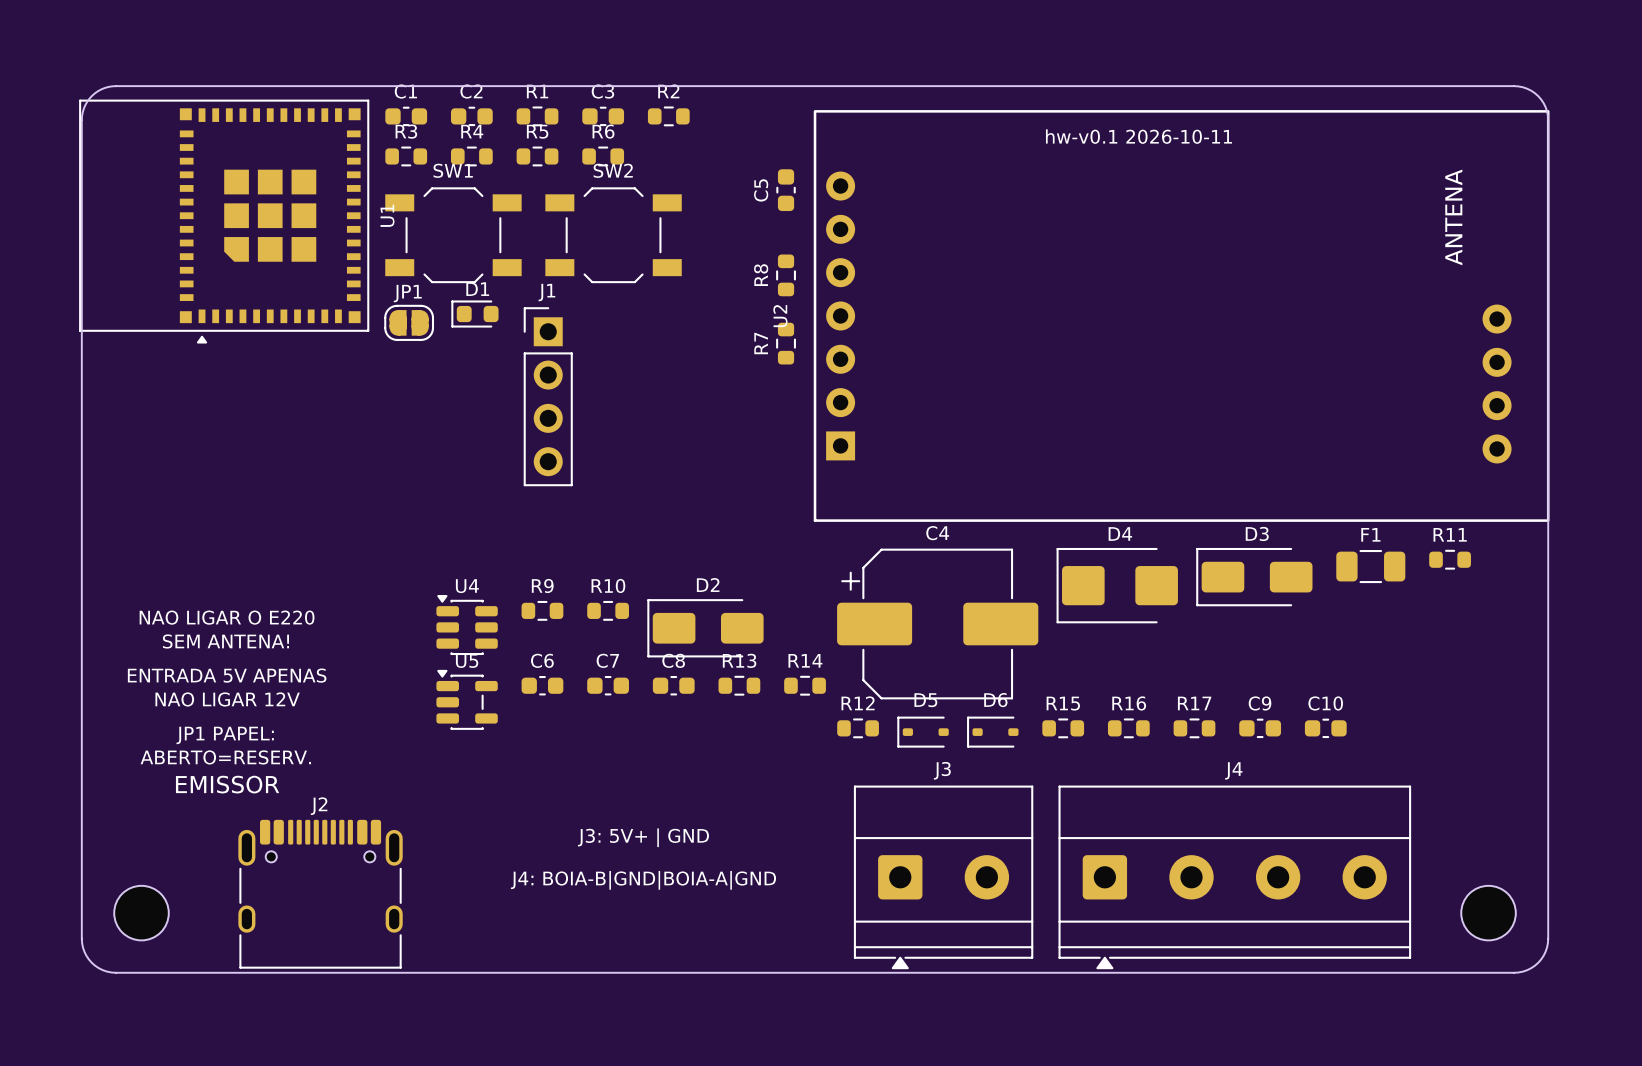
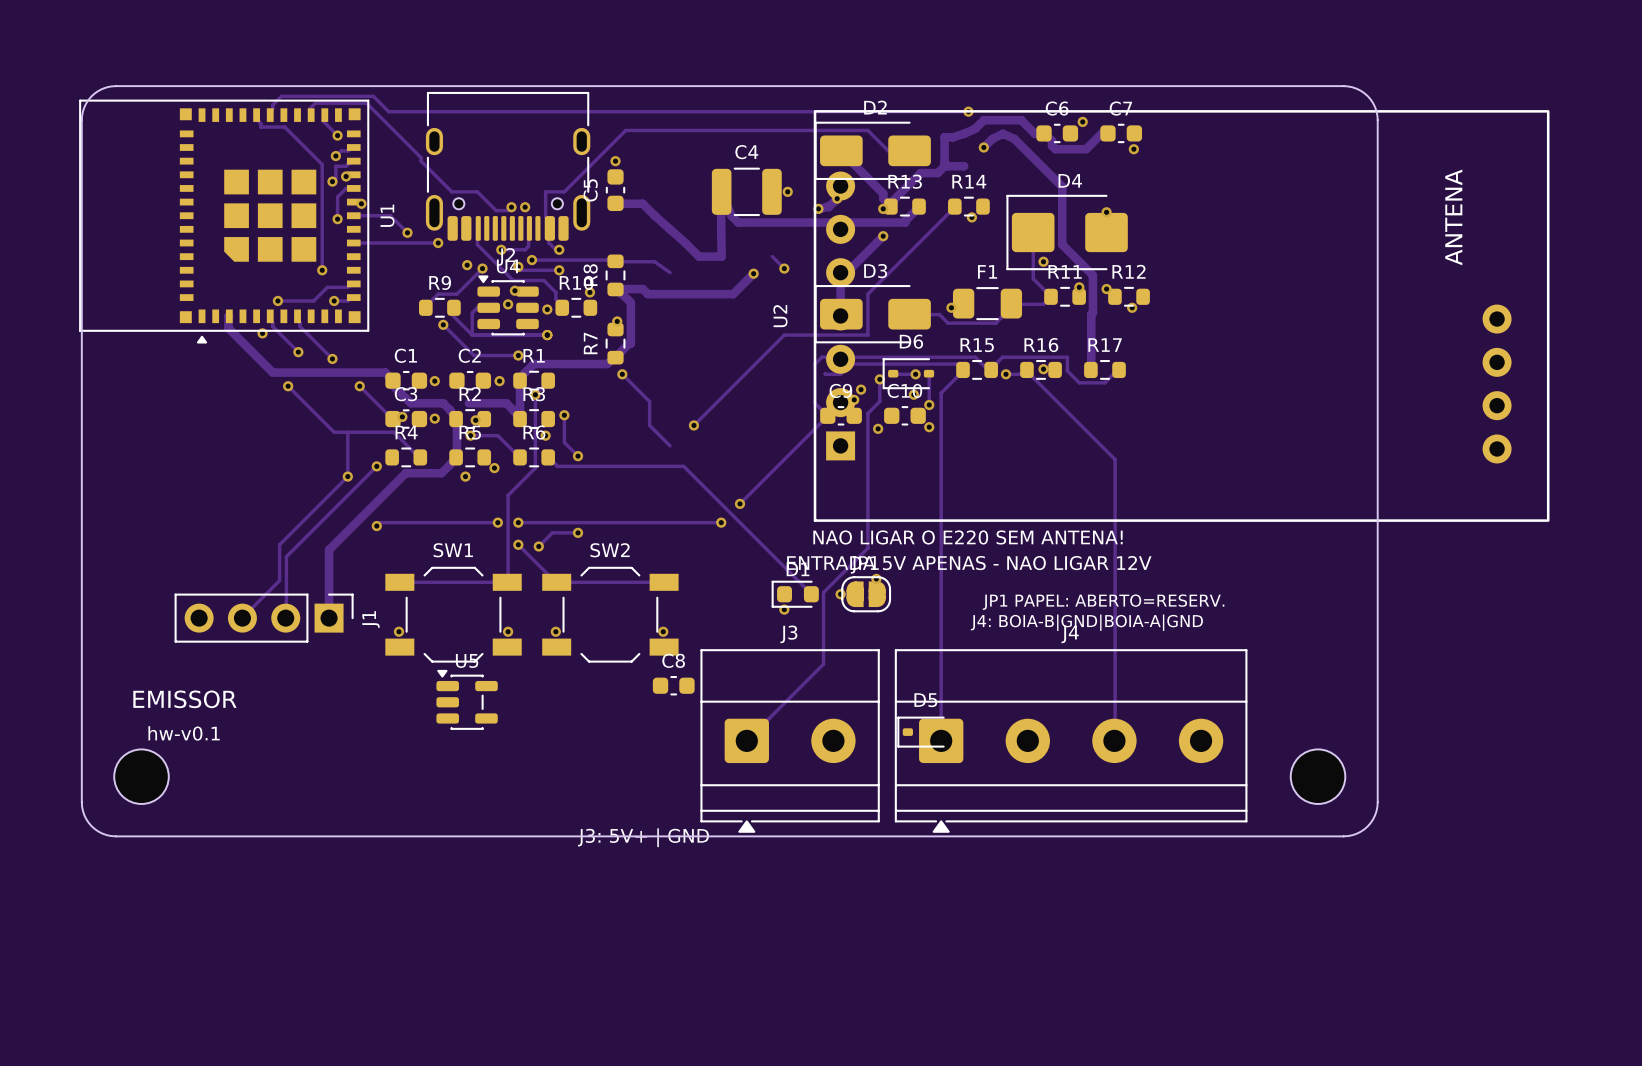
board edge: (1343, 86) (1518, 86) (1527, 88) (1538, 96) (1547, 111) (1548, 938) (1543, 955) (1531, 968) (1514, 972) (111, 972) (102, 970) (91, 962) (86, 955) (82, 943) (81, 802) -> (1343, 86) (1356, 88) (1367, 96) (1375, 107) (1377, 120) (1377, 802) (1373, 819) (1360, 831) (1343, 836) (115, 836) (102, 833) (91, 826) (84, 815) (81, 802)
track: none -> (968, 111) (388, 111) (373, 96) (281, 96) (272, 104) (270, 115)
via: none -> (968, 111)
track: none -> (256, 115) (260, 127) (284, 127) (322, 164) (322, 270)
track: none -> (311, 115) (310, 108) (315, 103) (366, 103) (421, 157) (421, 161) (451, 191) (477, 191) (496, 210) (511, 210)
track: none -> (324, 115) (323, 121) (337, 135)
C1 position: (406, 116) -> (406, 380)
C2 position: (471, 116) -> (470, 380)
R1 position: (537, 116) -> (534, 380)
C3 position: (603, 116) -> (406, 419)
R2 position: (668, 116) -> (470, 419)
via: none -> (1082, 121)
track: none -> (1107, 133) (1101, 133) (1086, 149) (1055, 149) (1052, 145) (1052, 140) (1044, 133) (1034, 133) (1021, 120) (983, 120) (975, 128) (964, 133) (944, 137) (944, 162) (948, 166) (964, 166)
via: none -> (337, 135)
text: hw-v0.1 2026-10-11 (1138, 136) -> none
track: none -> (353, 147) (347, 150) (341, 150) (335, 156)
track: none -> (983, 147) (992, 138) (1002, 133) (1014, 138) (1062, 186) (1062, 244) (1092, 275) (1090, 369)
via: none -> (983, 147)
via: none -> (1133, 149)
track: none -> (841, 150) (883, 193) (883, 198) (890, 206)
track: none -> (909, 150) (888, 150) (867, 130) (625, 130) (564, 191) (545, 191) (545, 215) (549, 228) (549, 242) (555, 249) (559, 249)
via: none -> (335, 156)
R3 position: (406, 156) -> (534, 419)
R4 position: (471, 156) -> (406, 457)
R5 position: (537, 156) -> (470, 457)
R6 position: (603, 156) -> (534, 457)
track: none -> (353, 161) (346, 166) (335, 166) (335, 178) (332, 181)
via: none -> (615, 161)
track: none -> (946, 164) (937, 173) (920, 173) (890, 203) (890, 206)
via: none -> (346, 176)
via: none -> (332, 181)
track: none -> (354, 188) (346, 188) (337, 196) (337, 219)
C5 position: (786, 190) -> (615, 190)
via: none -> (787, 191)
track: none -> (837, 198) (828, 207) (818, 208)
via: none -> (837, 198)
via: none -> (361, 203)
track: none -> (615, 203) (642, 203) (699, 256) (721, 256) (721, 191) (731, 215) (738, 222) (905, 222) (919, 206)
track: none -> (954, 206) (867, 294) (867, 335) (784, 335) (693, 425)
via: none -> (511, 207)
via: none -> (525, 207)
via: none -> (818, 208)
via: none -> (883, 208)
via: none -> (1106, 212)
track: none -> (353, 215) (390, 215) (407, 232)
via: none -> (971, 217)
via: none -> (337, 219)
track: none -> (478, 228) (477, 244) (513, 280) (543, 280) (555, 292) (555, 299) (562, 307)
track: none -> (529, 228) (528, 246) (525, 249) (501, 249)
via: none -> (407, 232)
track: none -> (1033, 232) (1033, 278) (1051, 296) (1043, 304) (1011, 303) (995, 323) (948, 323) (939, 314) (909, 314)
SW1 position: (453, 235) -> (453, 614)
SW2 position: (613, 235) -> (610, 614)
track: none -> (883, 236) (840, 278) (841, 314)
via: none -> (883, 236)
track: none -> (353, 242) (438, 242)
via: none -> (438, 242)
via: none -> (501, 249)
via: none -> (559, 249)
track: none -> (772, 256) (784, 268)
track: none -> (531, 260) (654, 261) (670, 272)
via: none -> (531, 260)
via: none -> (1043, 261)
via: none -> (467, 265)
track: none -> (518, 266) (521, 270) (559, 270)
via: none -> (518, 266)
track: none -> (482, 268) (456, 294) (438, 294) (425, 307)
via: none -> (482, 268)
via: none -> (784, 268)
via: none -> (322, 270)
via: none -> (559, 270)
track: none -> (753, 273) (733, 294) (647, 294) (642, 289) (615, 289) (630, 302) (630, 343) (615, 357) (606, 364) (533, 364) (520, 377) (520, 419) (506, 403) (468, 403)
via: none -> (753, 273)
R8 position: (786, 275) -> (615, 275)
track: none -> (353, 283) (347, 287) (327, 287) (313, 300) (277, 300)
via: none -> (1079, 287)
via: none -> (1106, 289)
via: none -> (514, 290)
via: none -> (589, 292)
track: none -> (353, 297) (347, 300) (334, 300)
via: none -> (277, 300)
via: none -> (334, 300)
via: none -> (508, 304)
track: none -> (453, 307) (453, 316) (472, 335)
track: none -> (489, 307) (477, 307) (472, 312) (472, 335)
via: none -> (951, 307)
via: none -> (1132, 307)
via: none -> (547, 309)
D1 position: (474, 314) -> (795, 594)
track: none -> (229, 316) (228, 328) (272, 372) (385, 372) (393, 380) (392, 384) (410, 403) (443, 403) (456, 419) (456, 457) (441, 473) (405, 473) (329, 549) (329, 618)
track: none -> (270, 316) (272, 326) (298, 352)
track: none -> (297, 316) (300, 326) (332, 358)
via: none -> (617, 321)
JP1 position: (409, 322) -> (866, 594)
track: none -> (443, 324) (473, 355) (518, 355)
via: none -> (443, 324)
via: none -> (262, 333)
track: none -> (472, 335) (547, 335)
via: none -> (547, 335)
R7 position: (786, 343) -> (615, 343)
via: none -> (298, 352)
via: none -> (518, 355)
via: none -> (332, 358)
via: none -> (1043, 369)
track: none -> (1119, 369) (1104, 382) (1079, 382) (1067, 370) (1067, 357) (1002, 357) (991, 369) (987, 369) (975, 357) (821, 357) (815, 364) (815, 403) (828, 415) (739, 503)
track: none -> (825, 373) (840, 374) (850, 364) (956, 364) (963, 369) (941, 393) (941, 740)
track: none -> (893, 373) (915, 374)
track: none -> (622, 374) (649, 401) (649, 425) (670, 445)
via: none -> (622, 374)
via: none -> (915, 374)
track: none -> (929, 374) (929, 404)
track: none -> (1005, 374) (1019, 374) (1026, 369) (1115, 459) (1114, 740)
via: none -> (1005, 374)
track: none -> (879, 379) (879, 401) (867, 413) (867, 548) (823, 592) (823, 664) (746, 740)
via: none -> (879, 379)
track: none -> (548, 380) (535, 394) (535, 468) (508, 495) (508, 582) (398, 582)
via: none -> (434, 381)
via: none -> (499, 381)
track: none -> (288, 386) (334, 432) (393, 432) (420, 457)
via: none -> (288, 386)
track: none -> (359, 386) (392, 418) (402, 416)
via: none -> (359, 386)
via: none -> (861, 389)
via: none -> (535, 394)
via: none -> (913, 394)
J1 rotation: 0° (548, 396) -> 90° clockwise (264, 618)
J1 position: (548, 396) -> (264, 618)
via: none -> (854, 399)
via: none -> (929, 404)
track: none -> (564, 415) (564, 442) (578, 456)
via: none -> (564, 415)
via: none -> (402, 416)
via: none -> (434, 418)
via: none -> (475, 420)
via: none -> (693, 425)
via: none -> (929, 427)
via: none -> (878, 428)
track: none -> (347, 432) (347, 476) (279, 544) (279, 580) (242, 618)
track: none -> (470, 435) (497, 435) (520, 457)
via: none -> (470, 435)
via: none -> (545, 435)
via: none -> (578, 456)
track: none -> (548, 457) (557, 466) (683, 466) (811, 594)
track: none -> (376, 466) (286, 556) (285, 618)
via: none -> (376, 466)
via: none -> (494, 468)
via: none -> (347, 476)
via: none -> (465, 476)
via: none -> (739, 503)
track: none -> (497, 522) (380, 522) (376, 526)
via: none -> (497, 522)
track: none -> (518, 522) (721, 522)
via: none -> (518, 522)
via: none -> (721, 522)
via: none -> (376, 526)
track: none -> (578, 532) (552, 532) (538, 546)
via: none -> (578, 532)
C4 name position: C4 (937, 533) -> C4 (746, 152)
text: none -> NAO LIGAR O E220 SEM ANTENA! (967, 537)
track: none -> (518, 544) (555, 582) (664, 582)
via: none -> (518, 544)
via: none -> (538, 546)
C4 footprint: [837, 548, 1039, 700] -> [711, 167, 782, 217]
R11 position: (1450, 559) -> (1065, 296)
text: none -> ENTRADA 5V APENAS - NAO LIGAR 12V (969, 563)
F1 position: (1370, 566) -> (987, 303)
D3 position: (1254, 577) -> (872, 314)
via: none -> (876, 578)
D4 position: (1117, 585) -> (1067, 232)
via: none -> (840, 594)
text: none -> JP1 PAPEL: ABERTO=RESERV. (1103, 602)
via: none -> (784, 609)
R9 position: (542, 610) -> (439, 307)
R10 position: (608, 610) -> (576, 307)
text: NAO LIGAR O E220 (227, 617) -> none
text: none -> J4: BOIA-B|GND|BOIA-A|GND (1086, 622)
U4 position: (467, 625) -> (508, 305)
D2 position: (705, 628) -> (872, 150)
via: none -> (398, 631)
via: none -> (508, 631)
via: none -> (555, 631)
via: none -> (663, 631)
text: SEM ANTENA! (225, 641) -> none
text: ENTRADA 5V APENAS (227, 675) -> none
C6 position: (542, 685) -> (1057, 133)
C7 position: (608, 685) -> (1121, 133)
R13 position: (739, 685) -> (904, 206)
R14 position: (805, 685) -> (968, 206)
text: NAO LIGAR 12V (227, 699) -> none
R12 position: (858, 728) -> (1129, 296)
R15 position: (1063, 728) -> (977, 369)
R16 position: (1128, 728) -> (1041, 369)
R17 position: (1194, 728) -> (1104, 369)
C9 position: (1260, 728) -> (841, 415)
C10 position: (1325, 728) -> (904, 415)
D6 position: (992, 732) -> (908, 373)
text: none -> hw-v0.1 (184, 733)
text: JP1 PAPEL: (225, 735) -> none
text: ABERTO=RESERV. (225, 757) -> none
text position: EMISSOR (227, 784) -> EMISSOR (184, 699)
J3 position: (943, 877) -> (790, 740)
J4 position: (1234, 877) -> (1071, 740)
text: J4: BOIA-B|GND|BOIA-A|GND (643, 880) -> none
J2 rotation: 0° (320, 894) -> 180° (508, 166)
J2 position: (320, 894) -> (508, 166)
part position: (141, 913) -> (141, 776)
part position: (1488, 913) -> (1318, 776)

